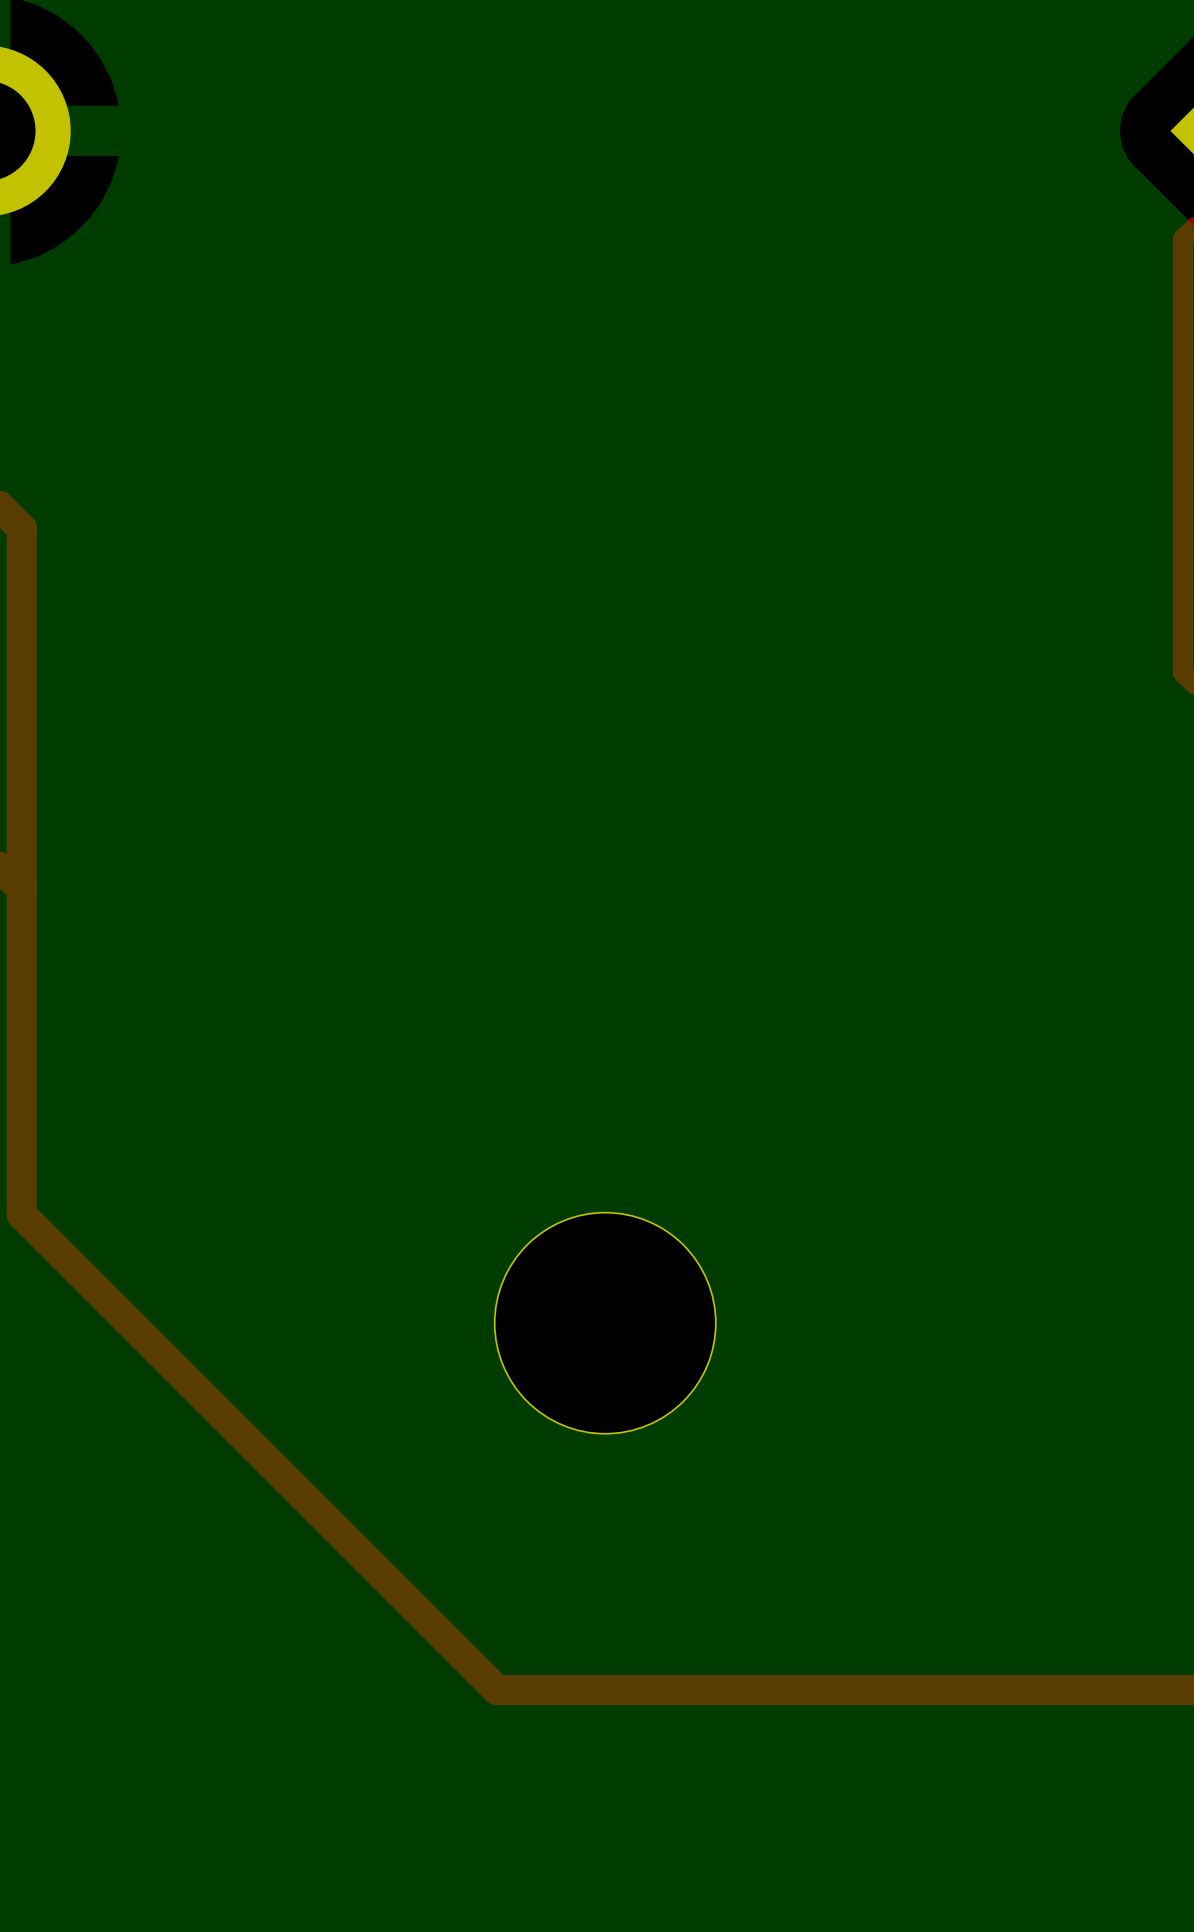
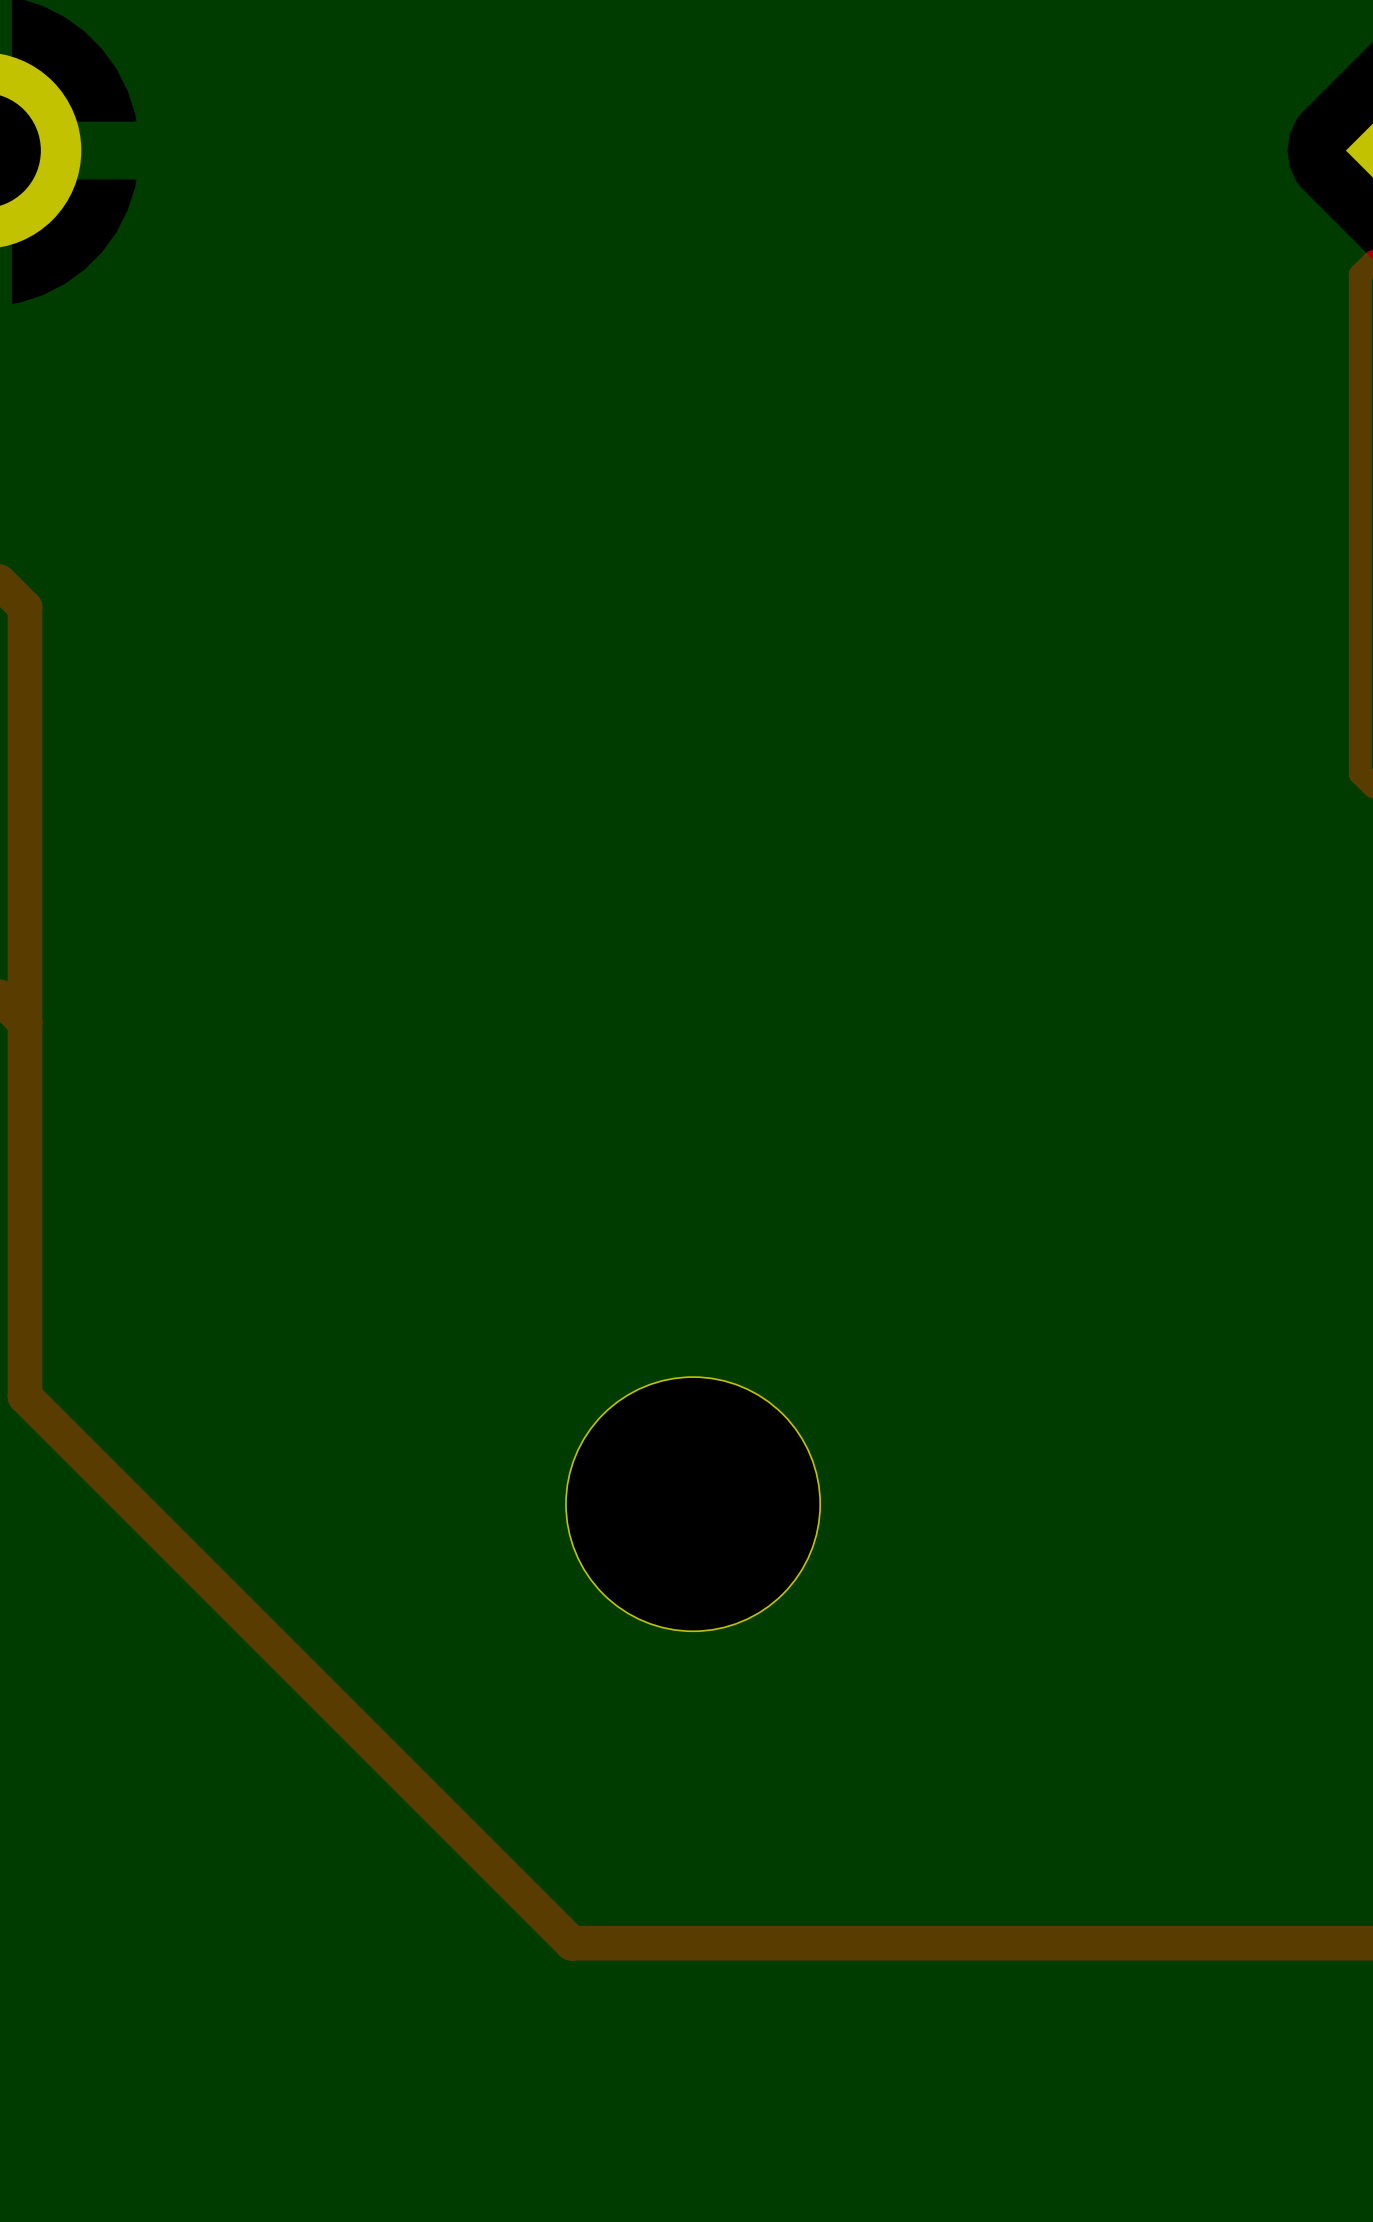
part position: (605, 1323) -> (693, 1504)

